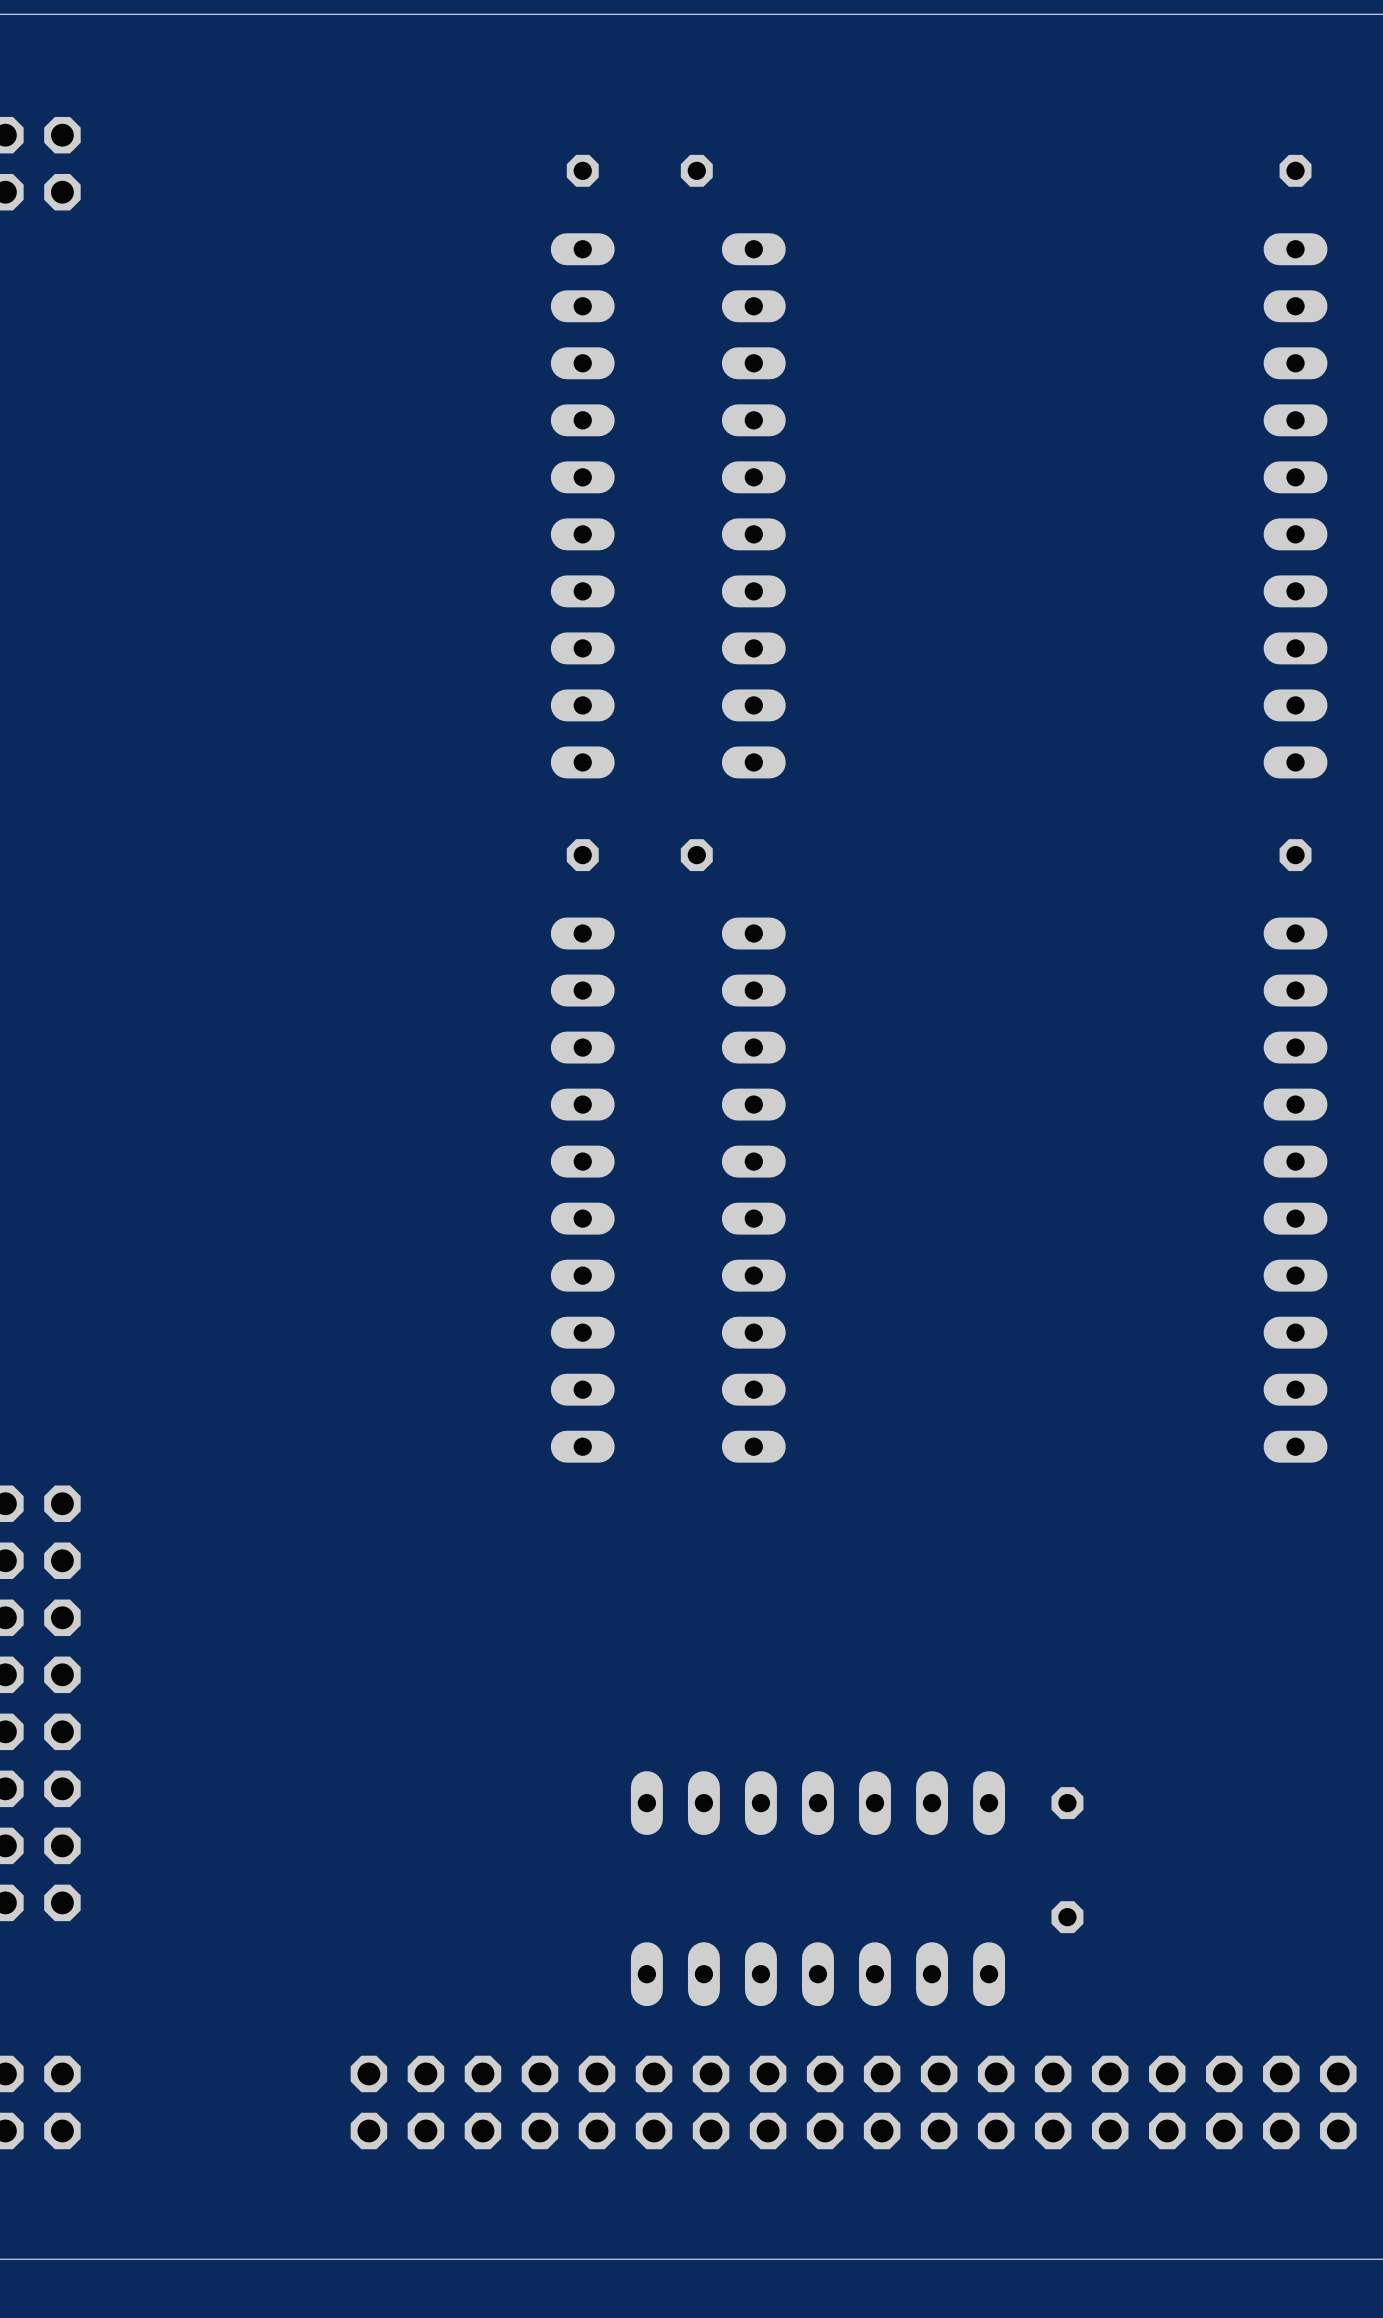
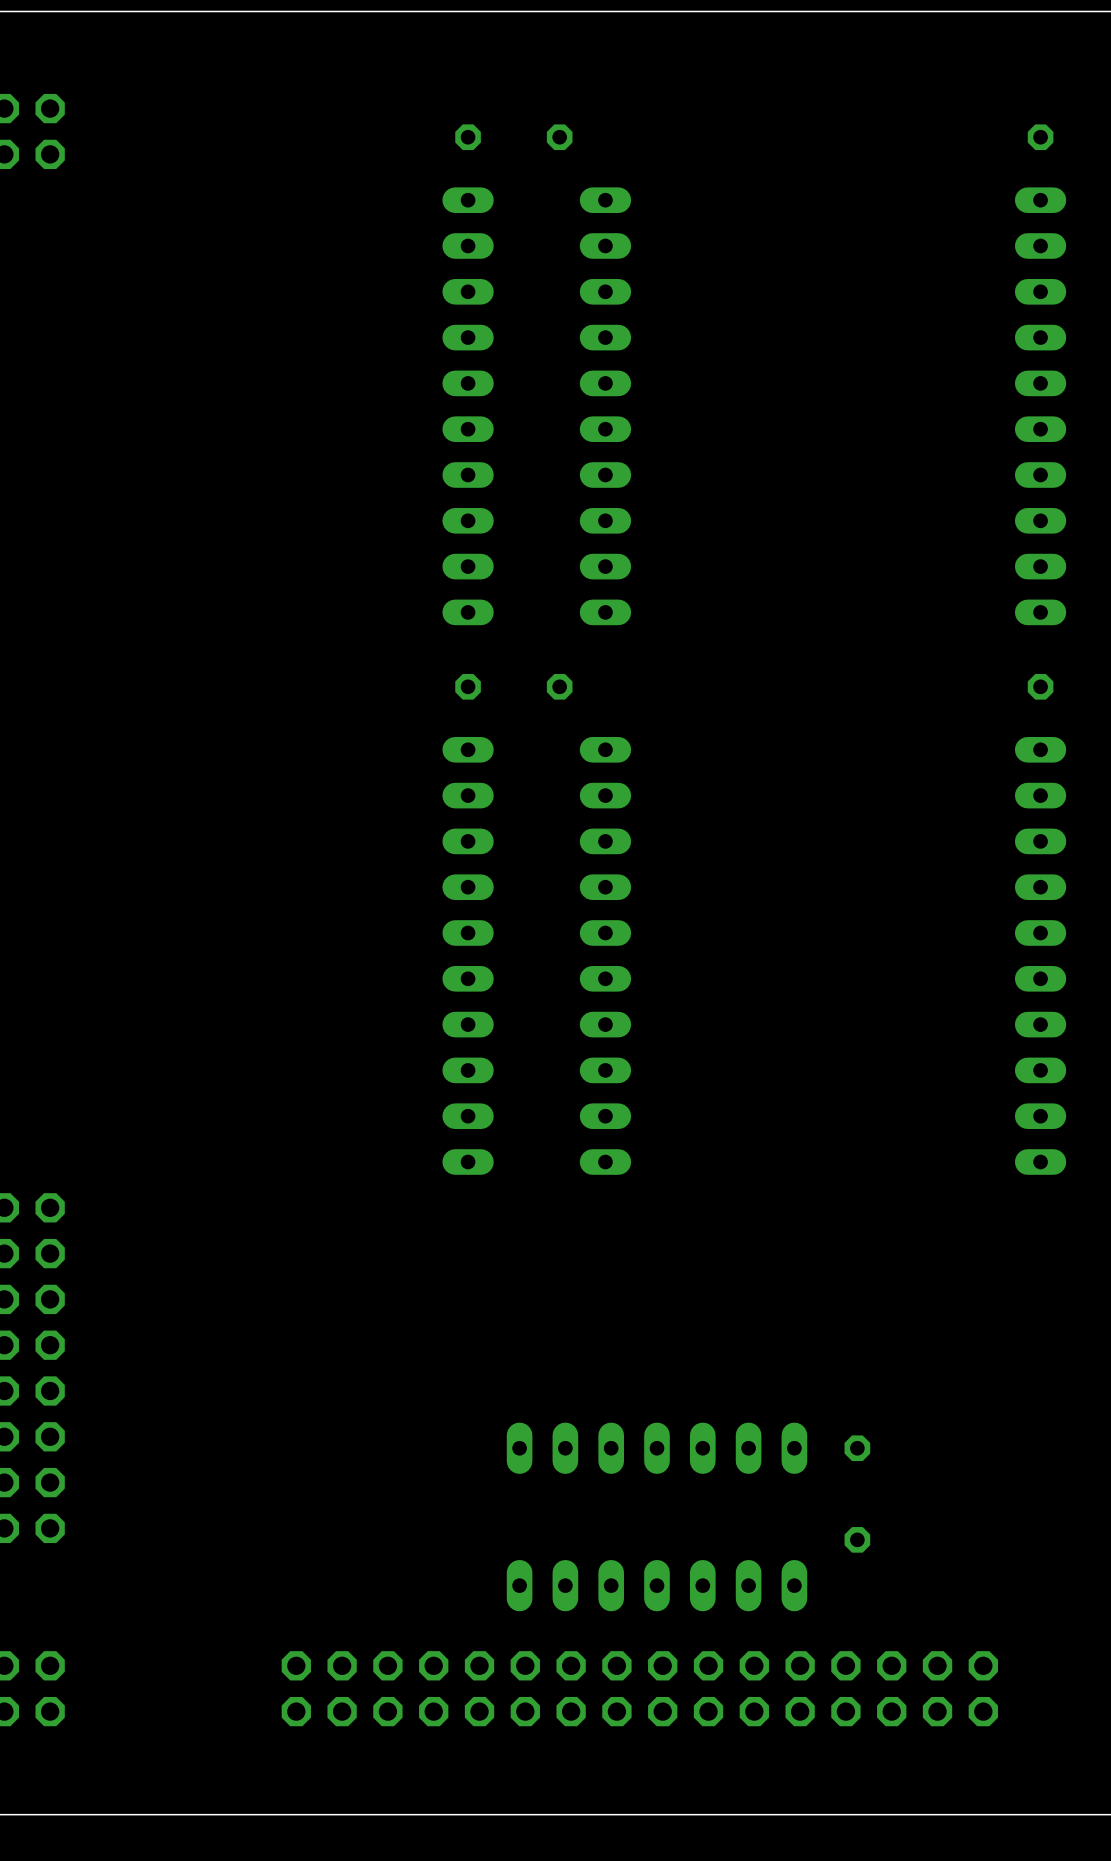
part: (853, 2102) -> none

